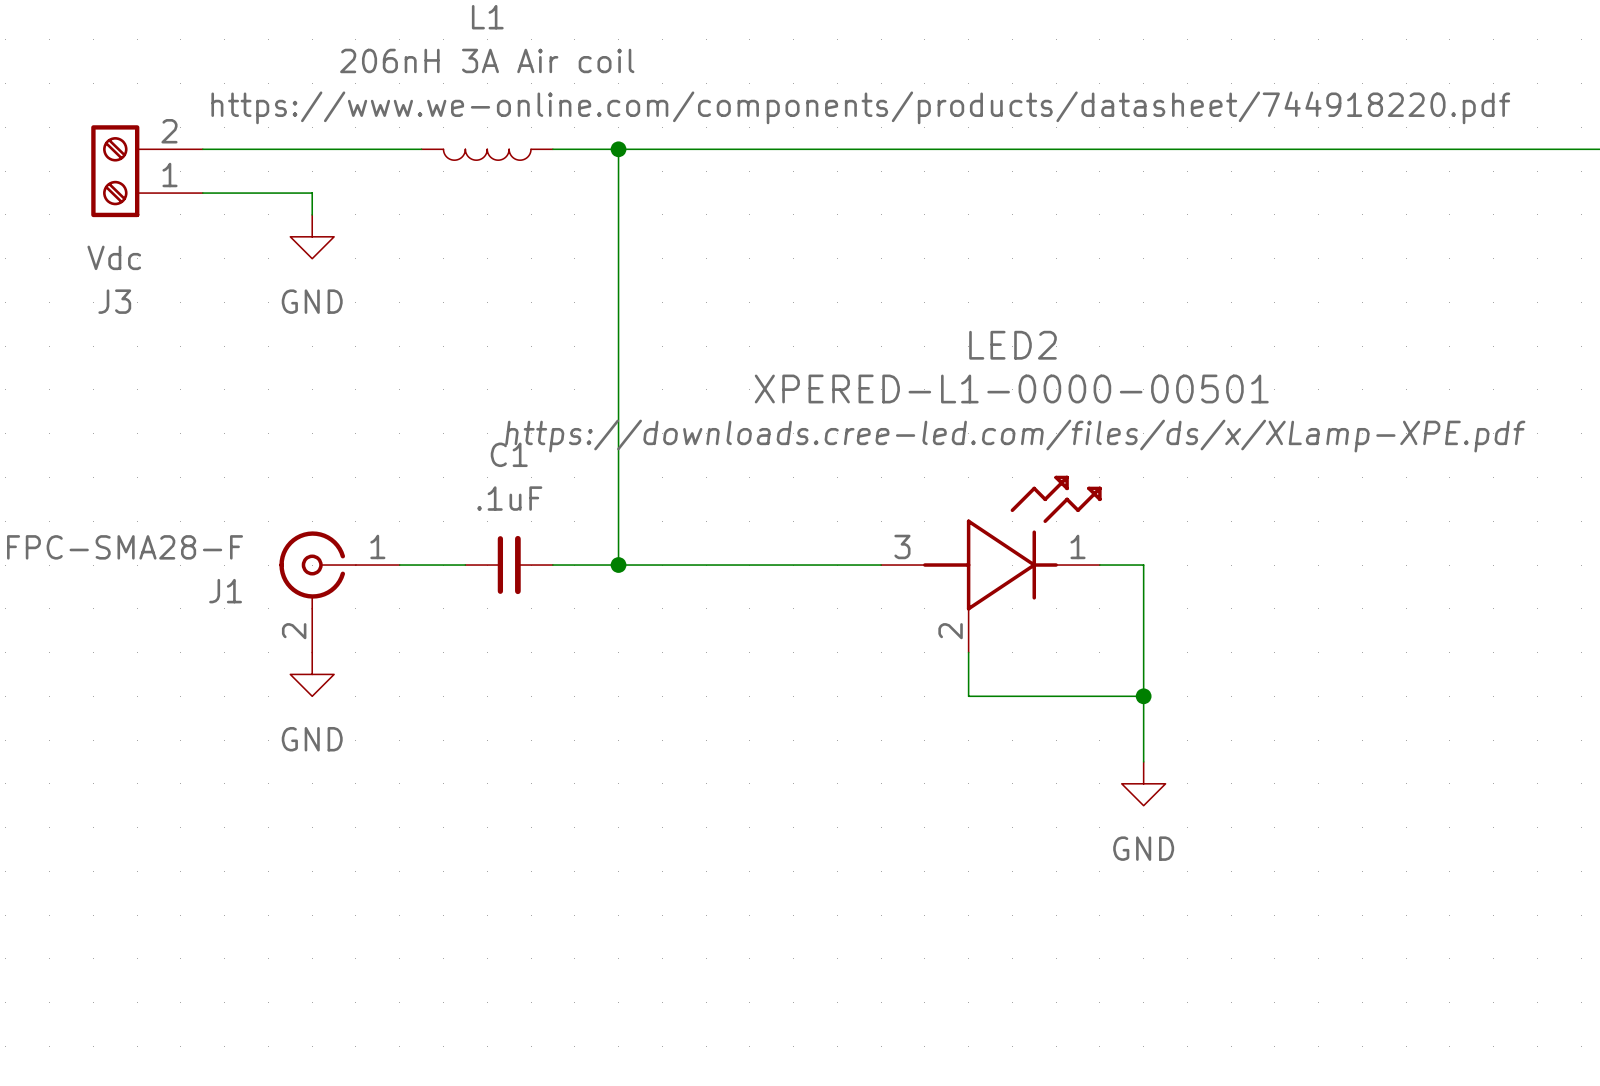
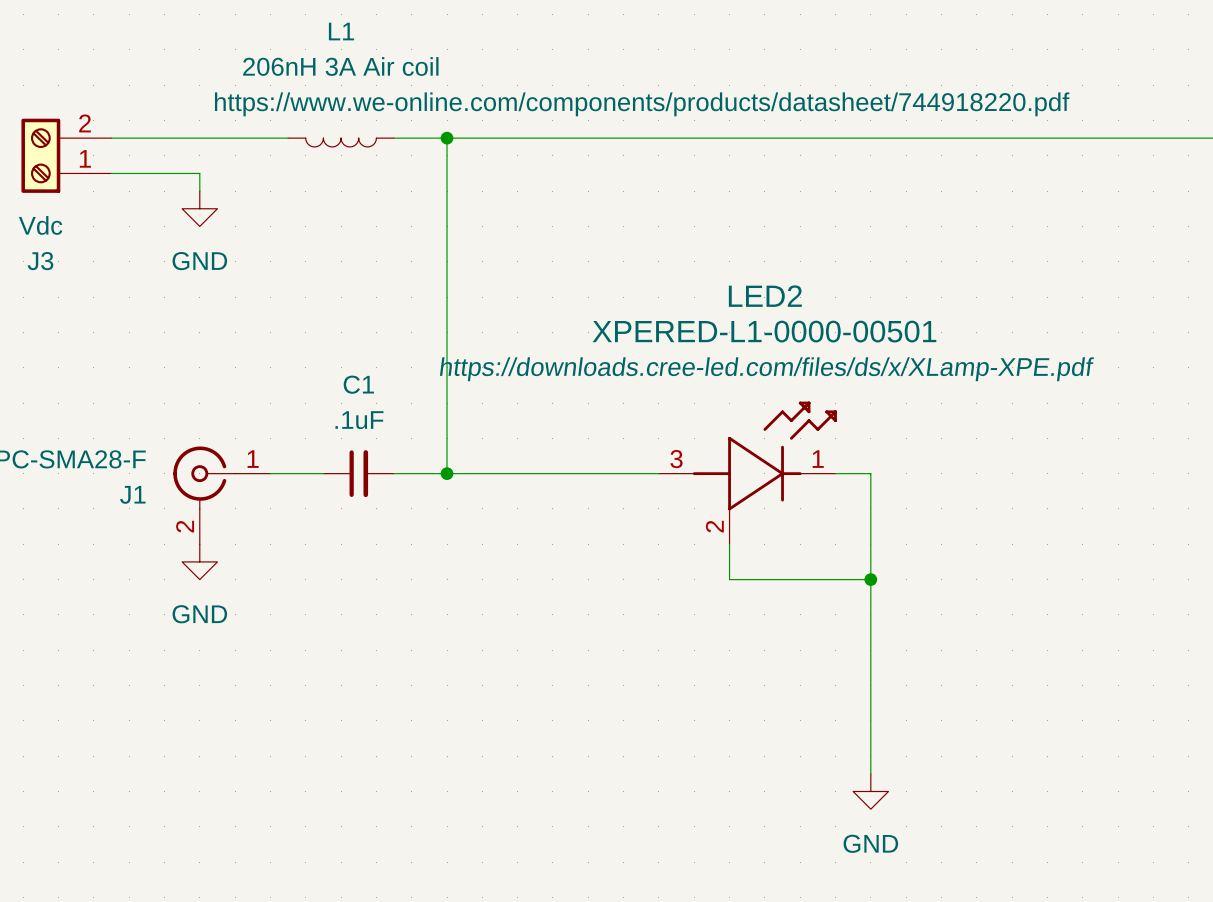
wire: none -> (870, 632) (870, 773)
power symbol position: GND (1143, 783) -> GND (870, 791)

